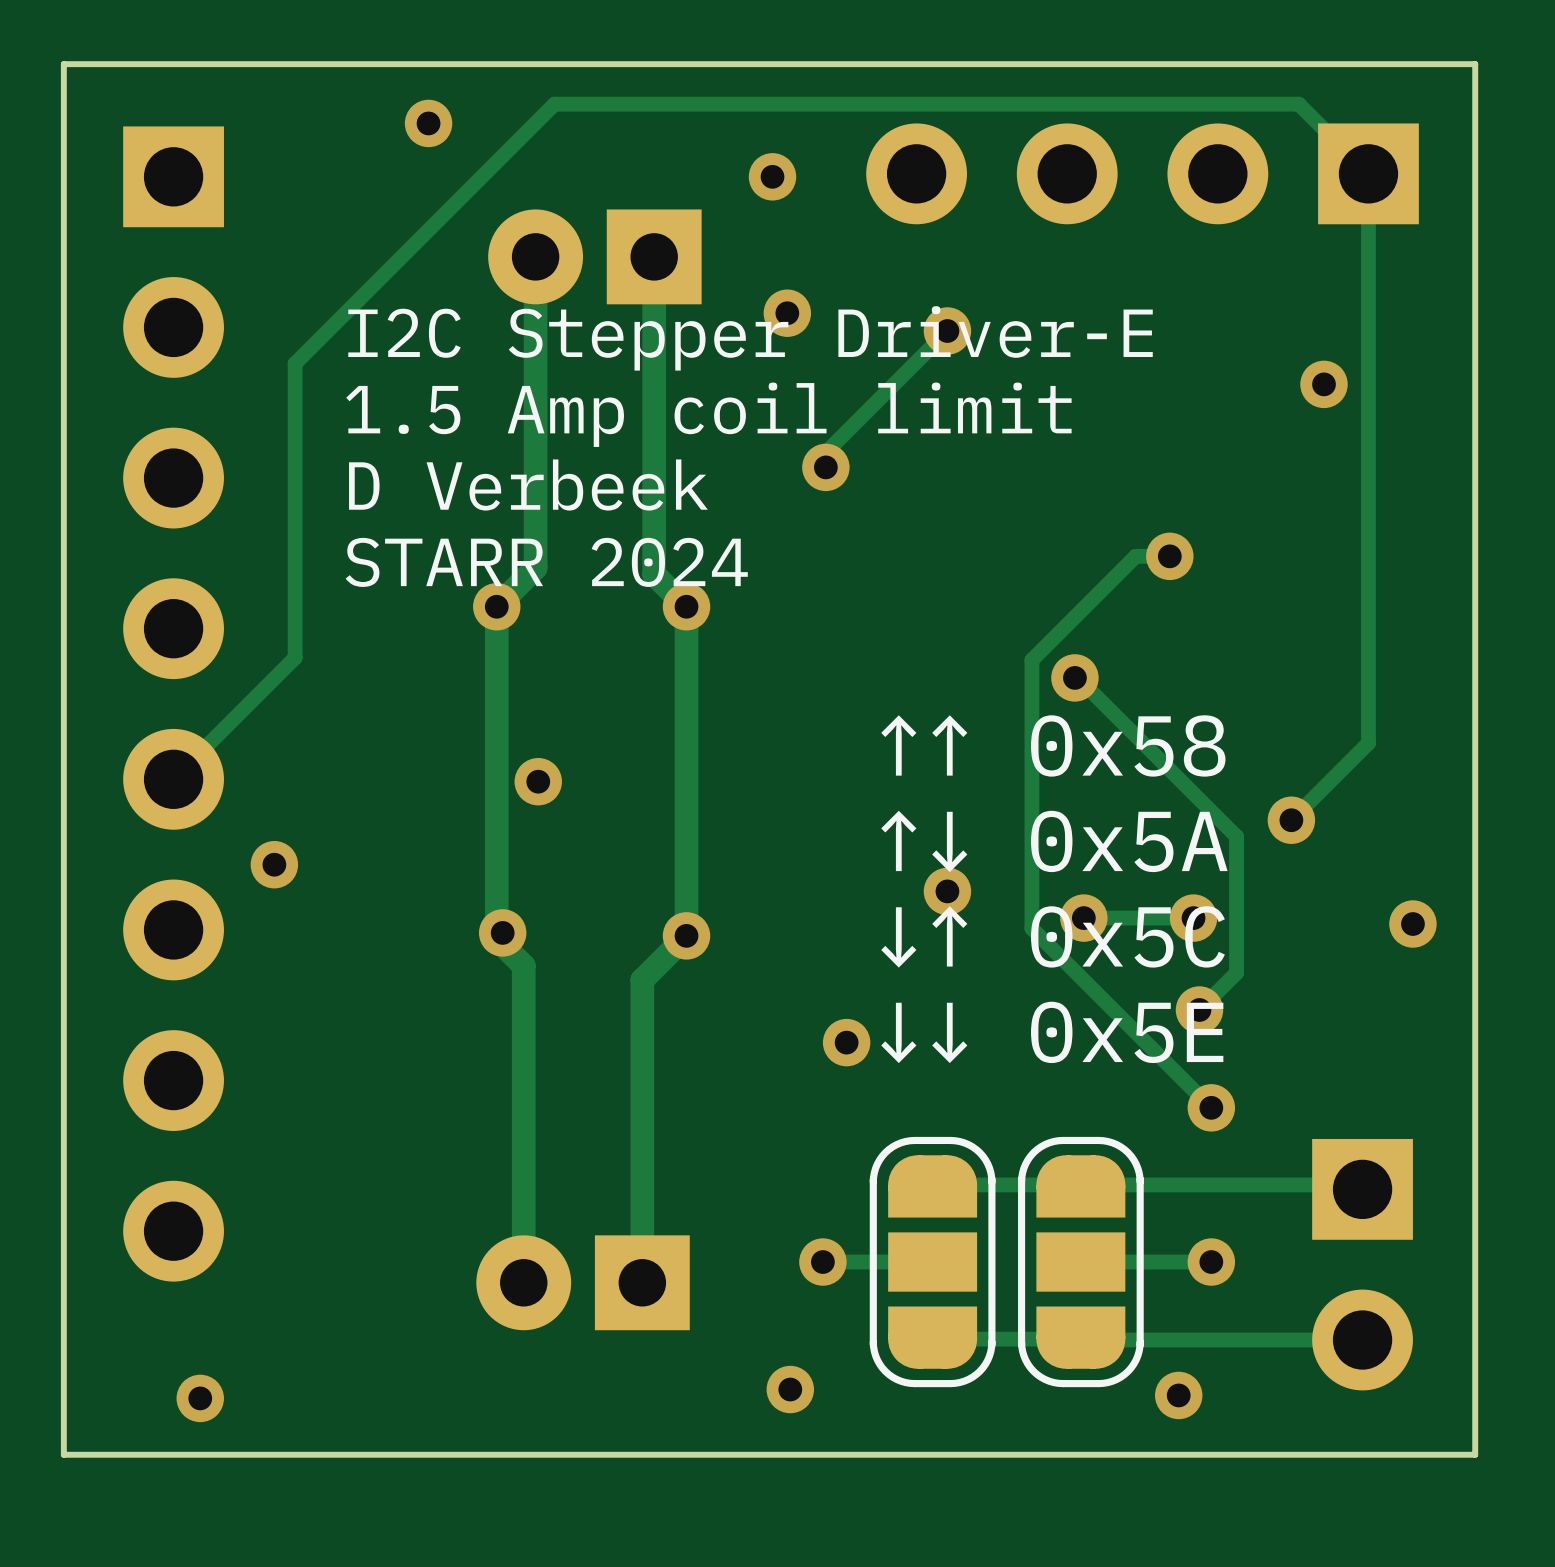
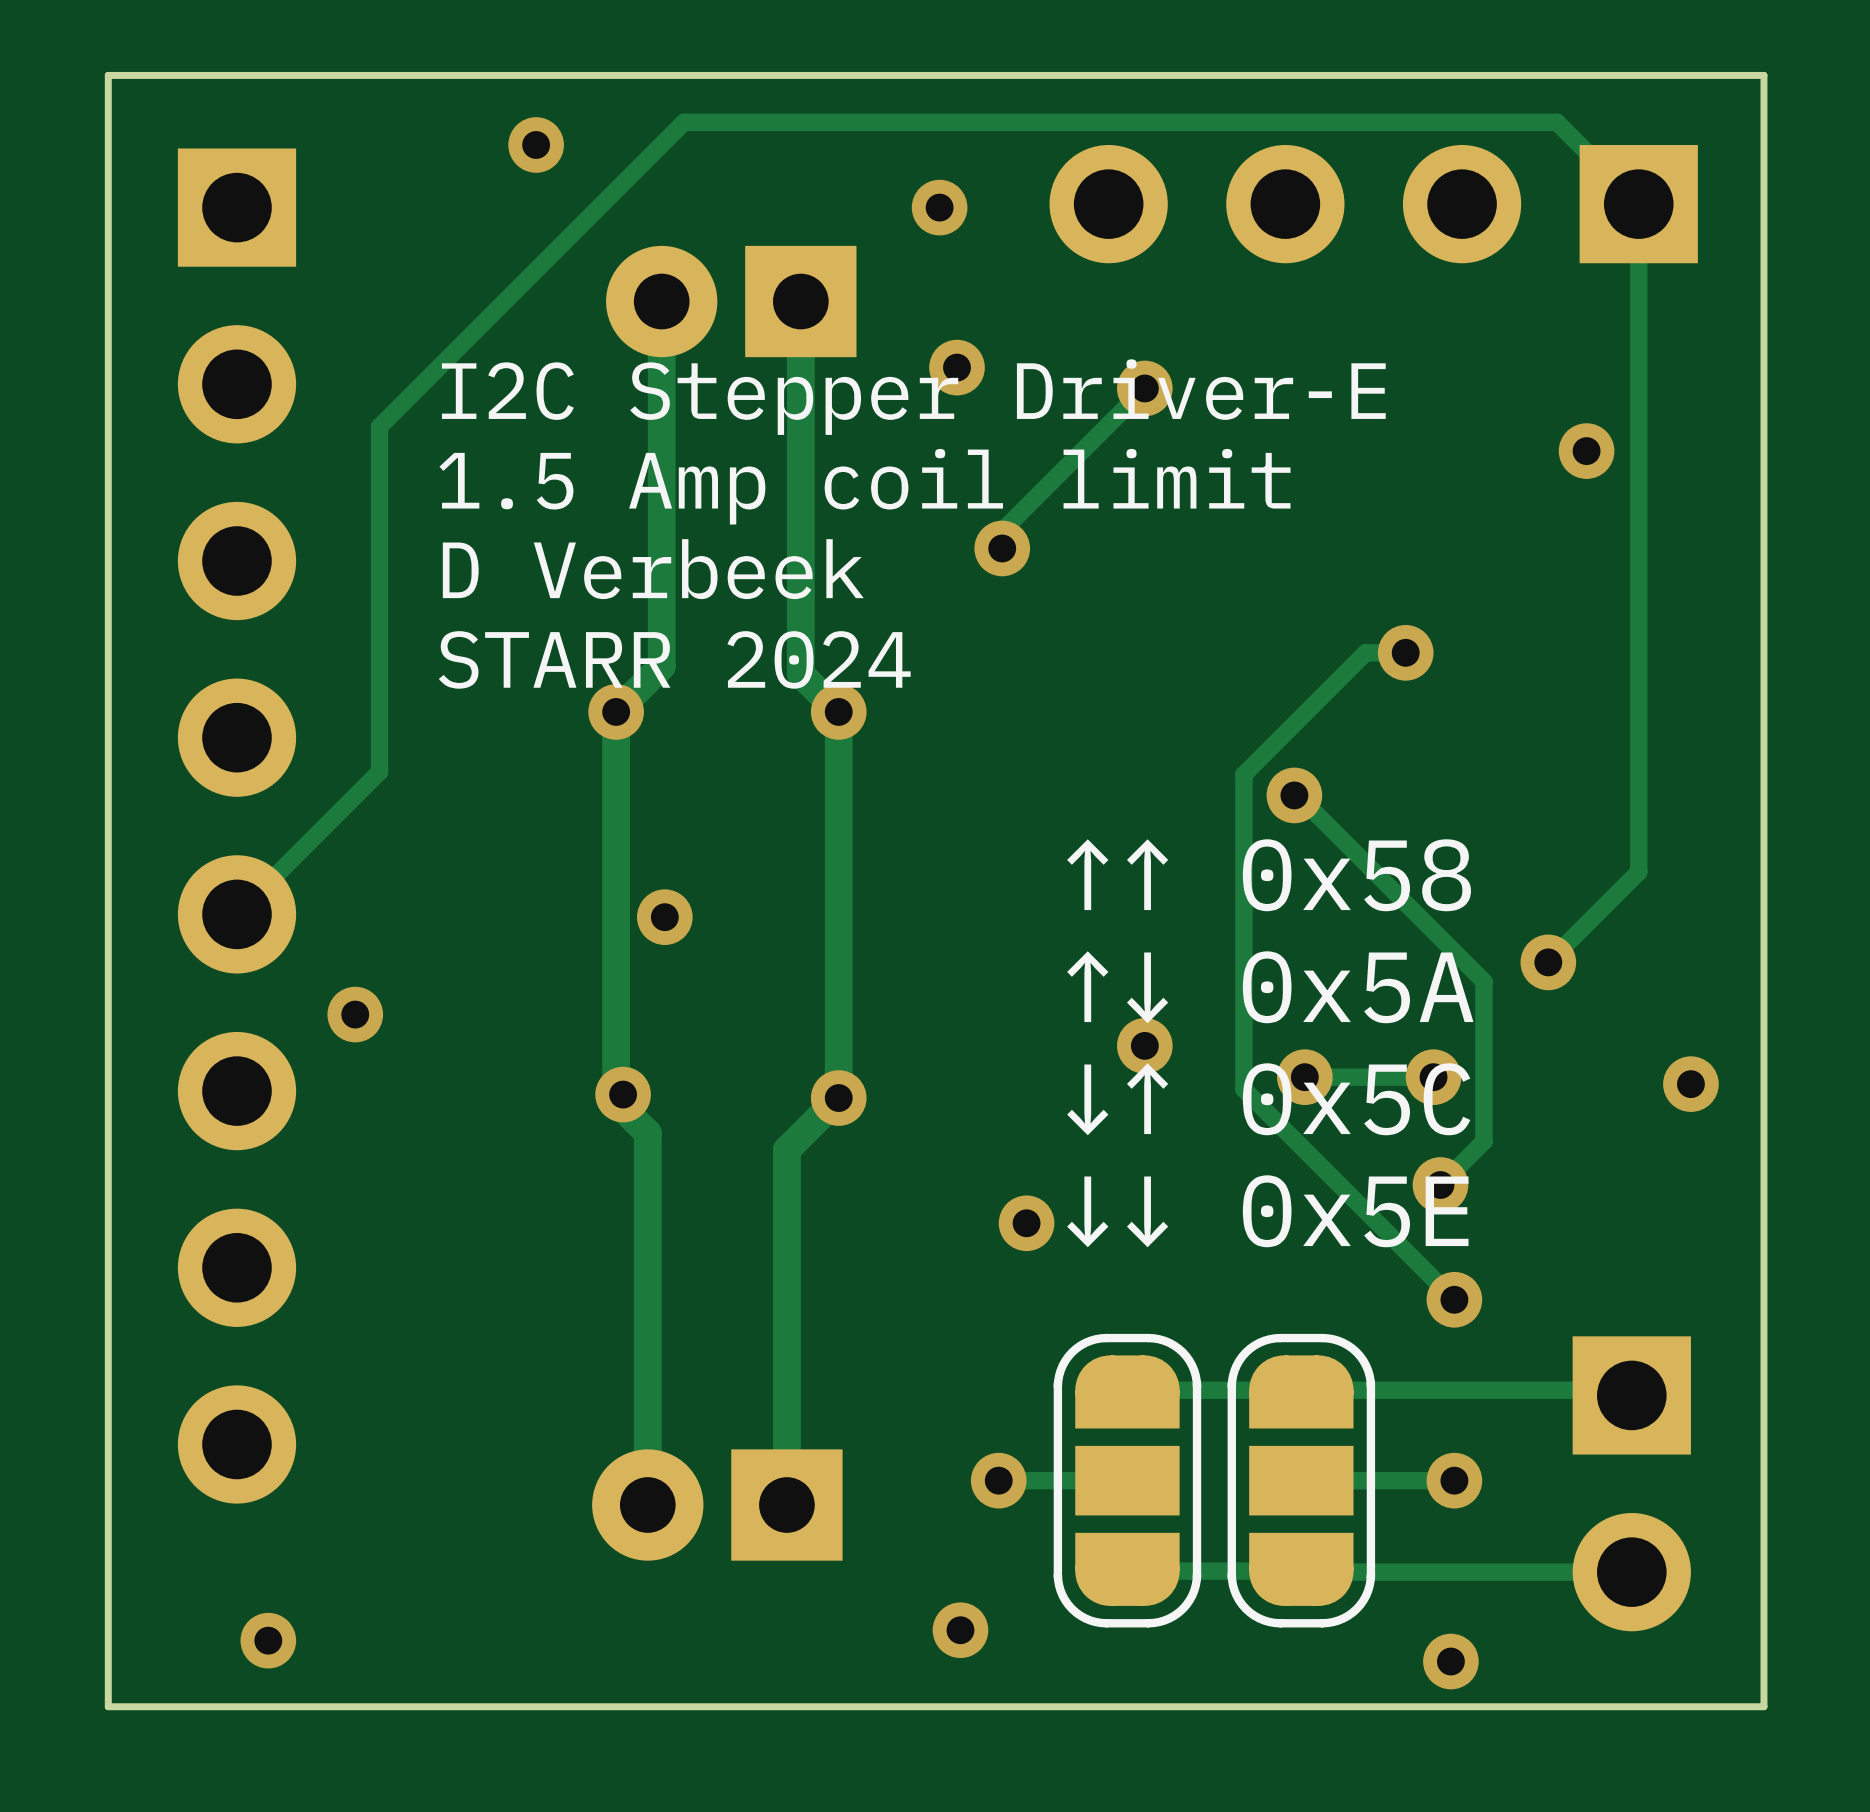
via position: (1178, 1395) -> (1450, 1661)

